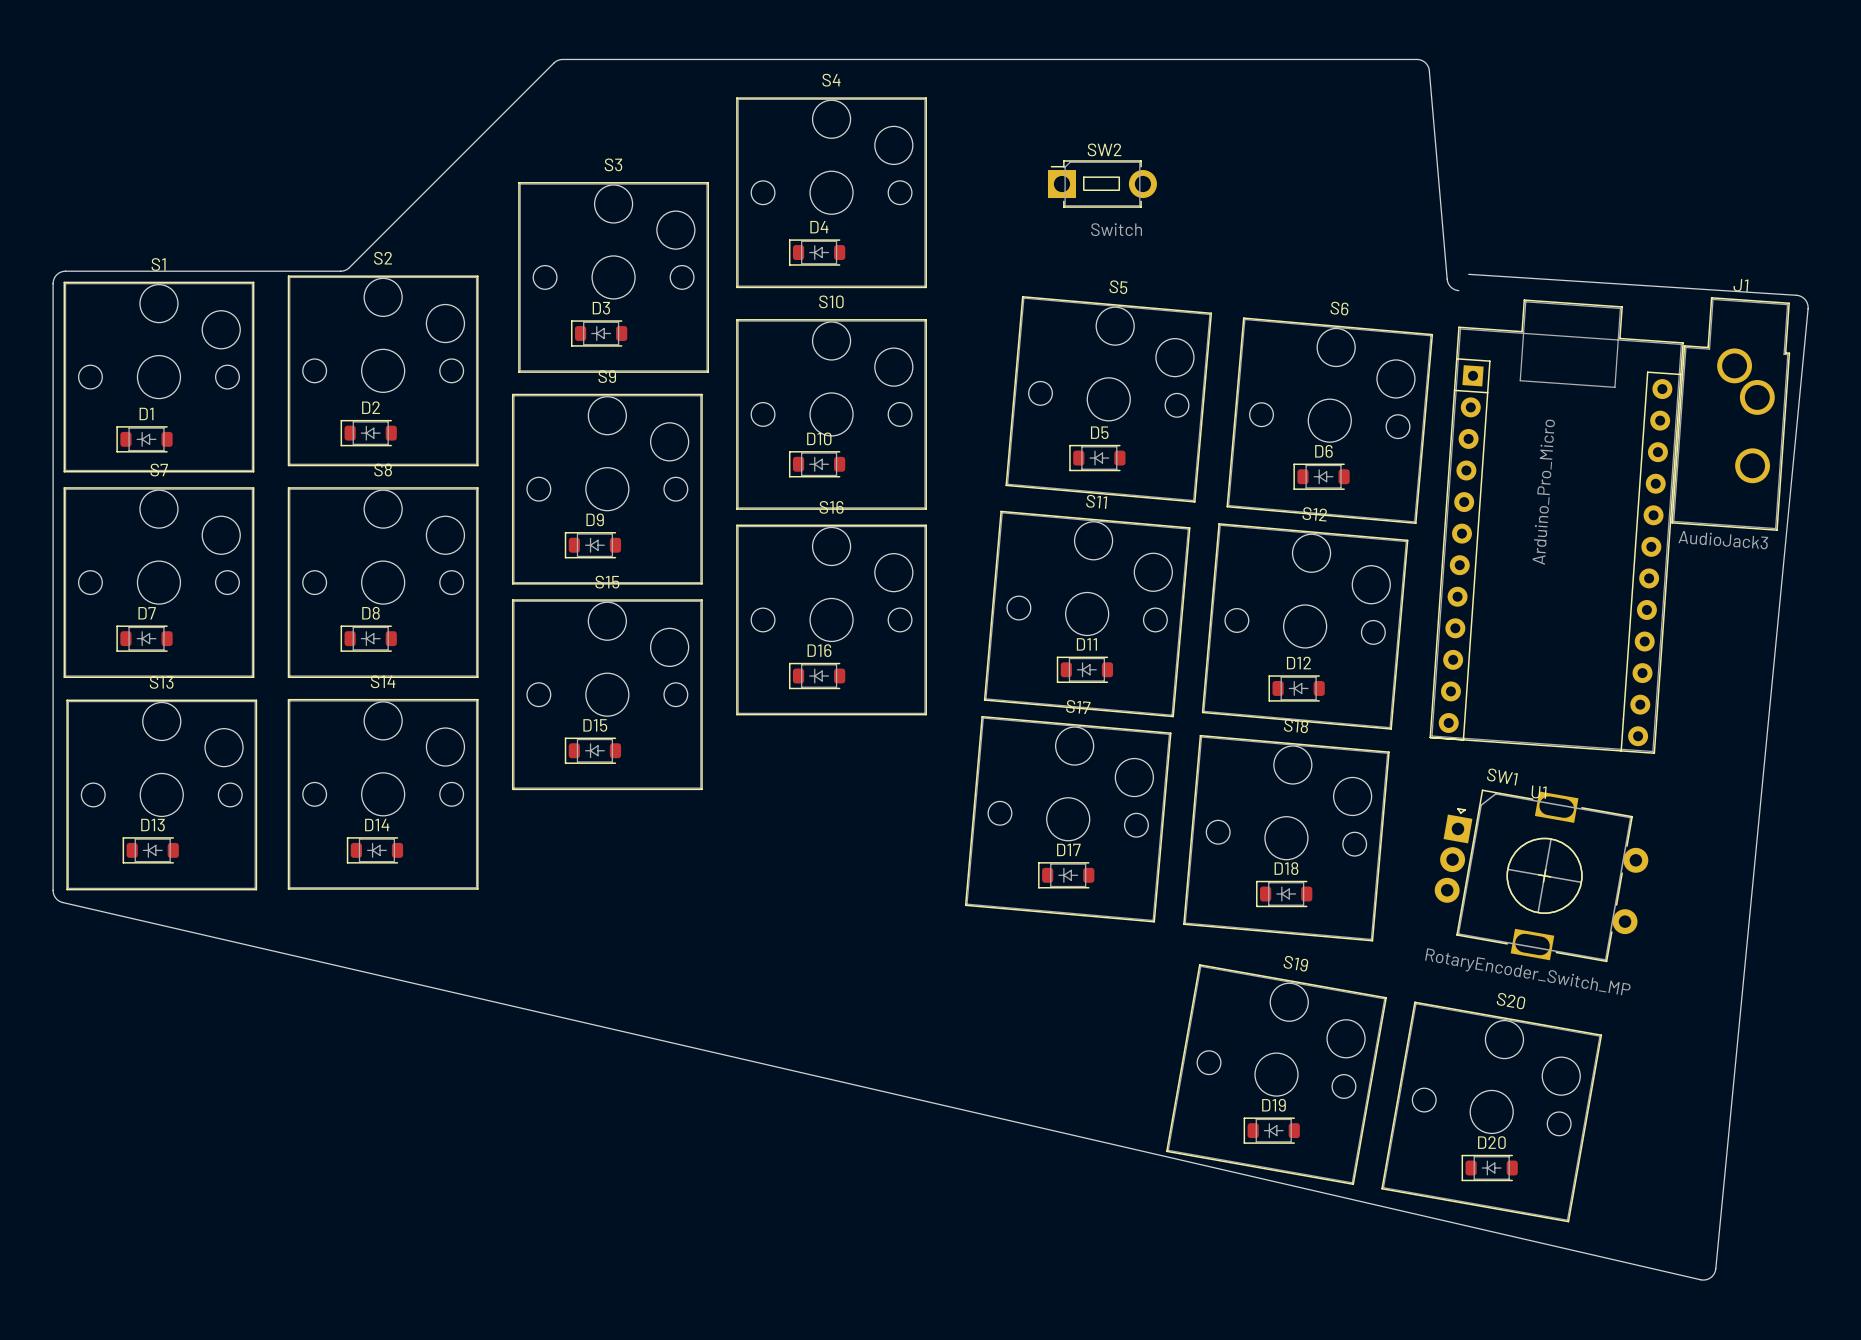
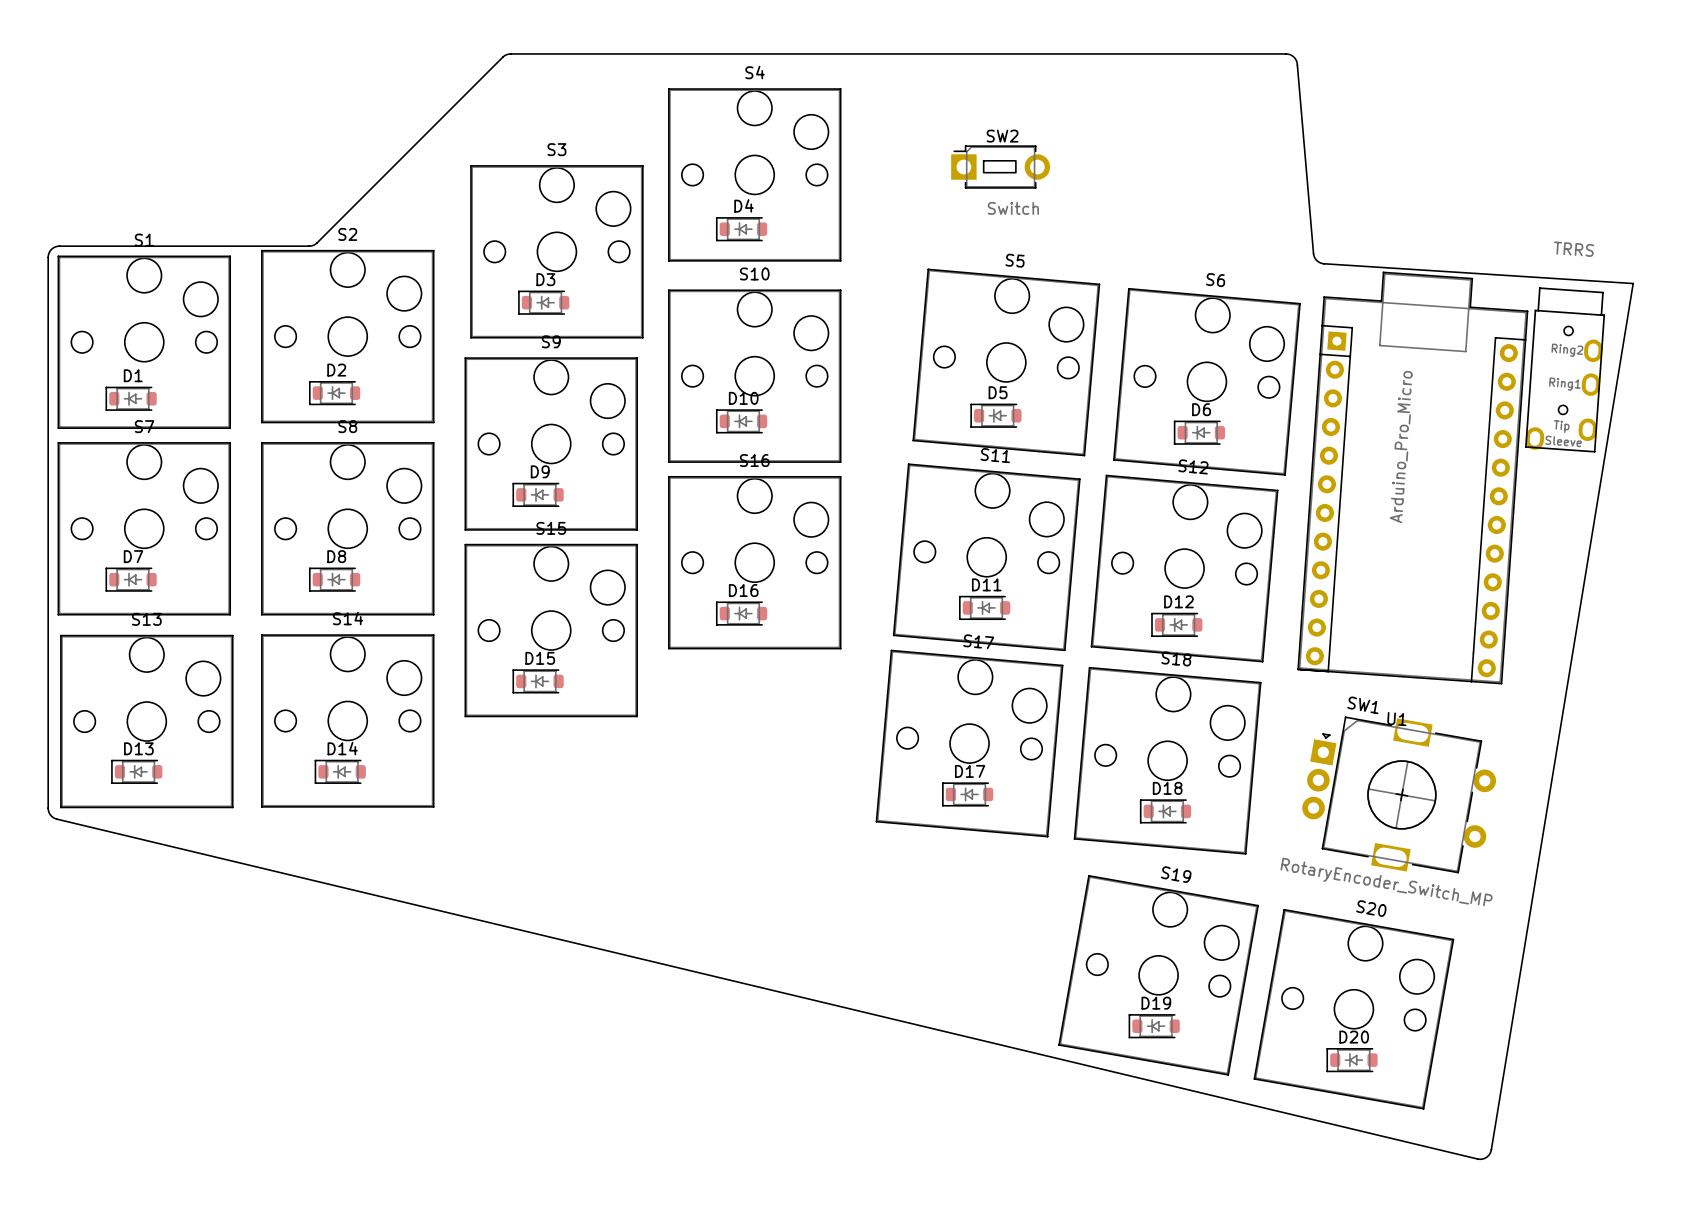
board edge: (1468, 274) (1796, 295) (1804, 298) (1807, 304) (1715, 1268) (1712, 1275) (1708, 1279) (1700, 1279) (62, 902) -> (1324, 263) (1633, 283) (1491, 1149) (1489, 1154) (1484, 1158) (1477, 1158) (56, 819)
part: none -> TRRS (1565, 369)
J1: AudioJack3 (1730, 414) -> none

